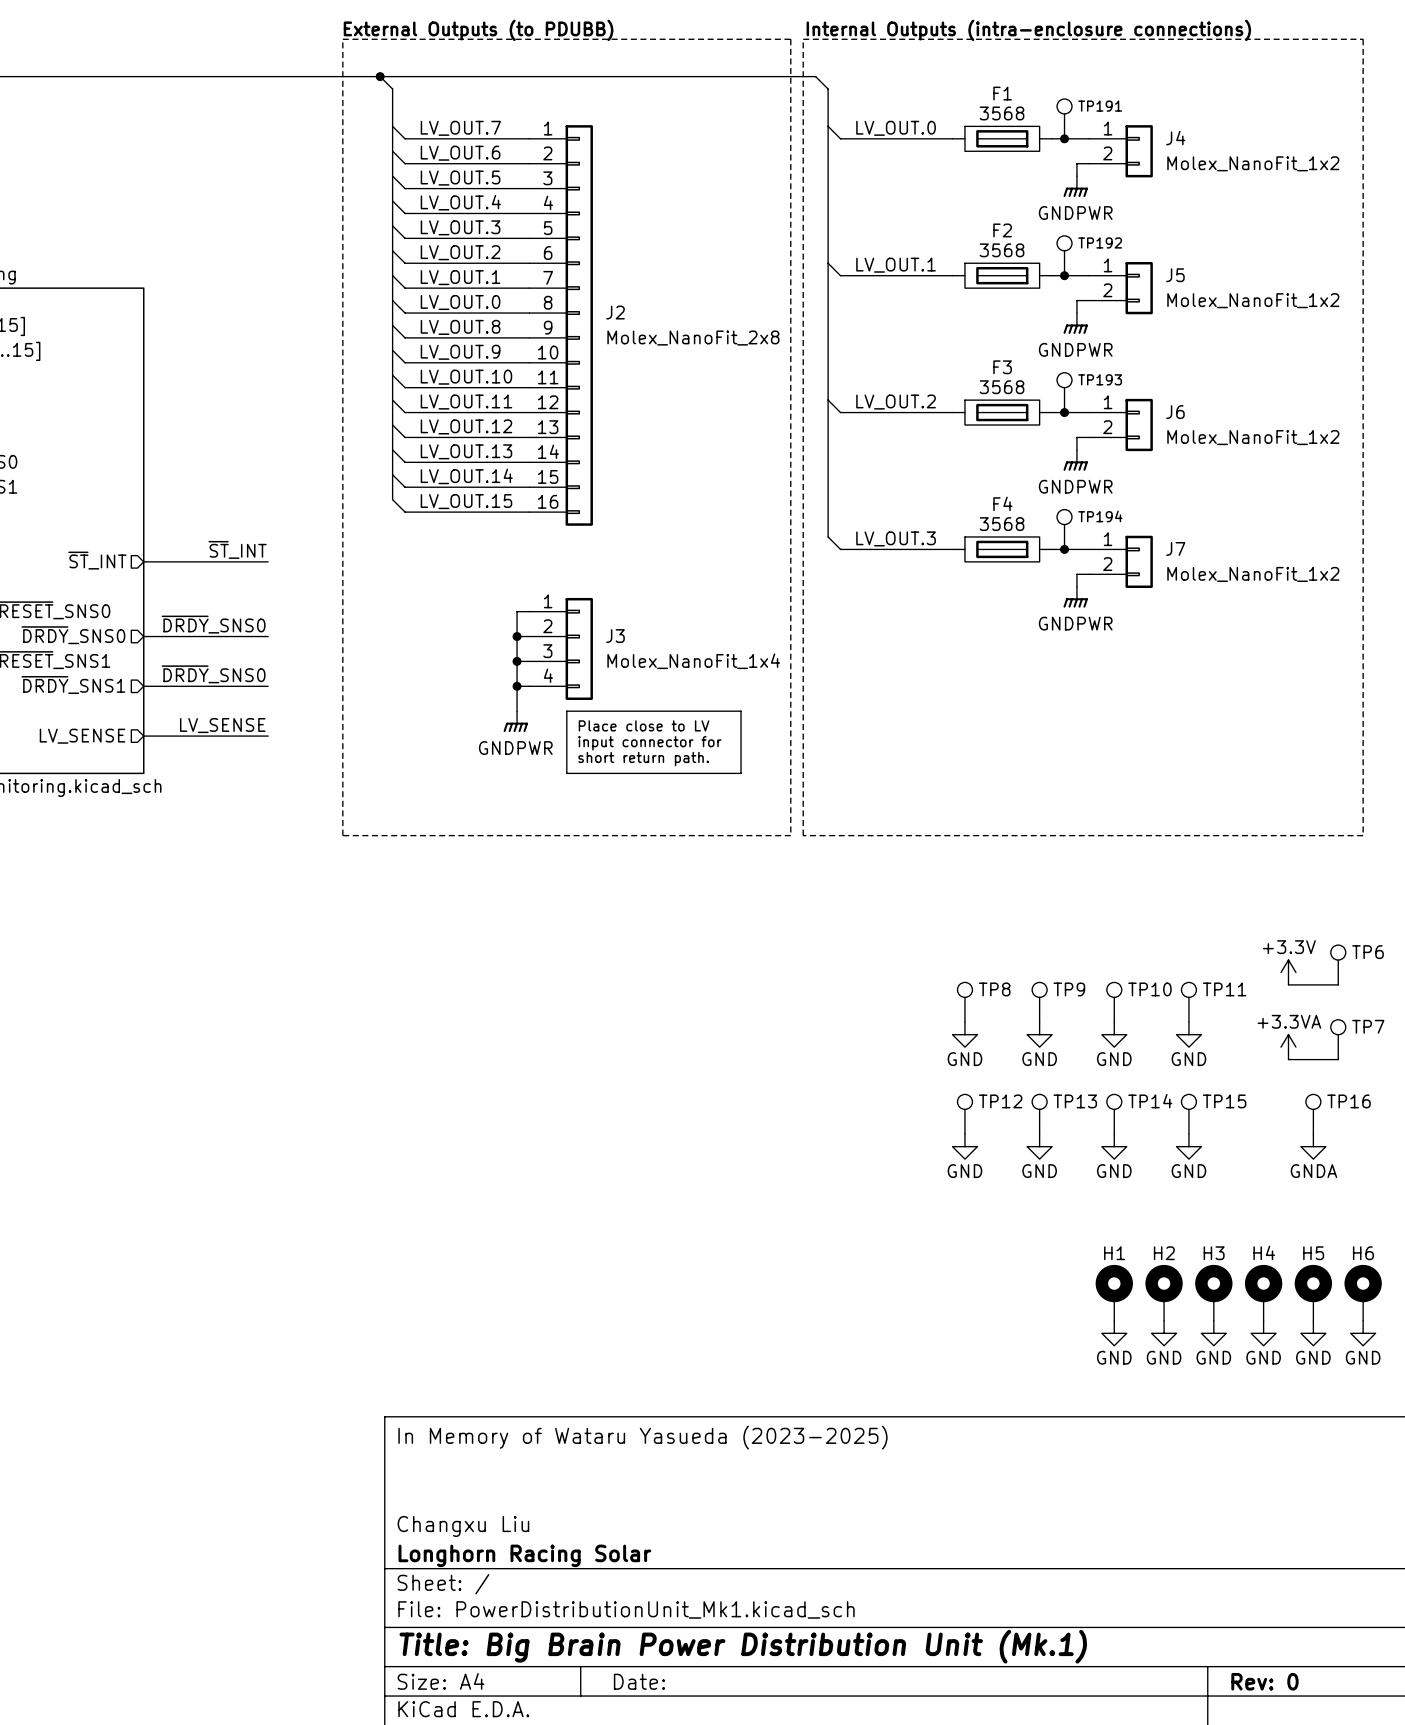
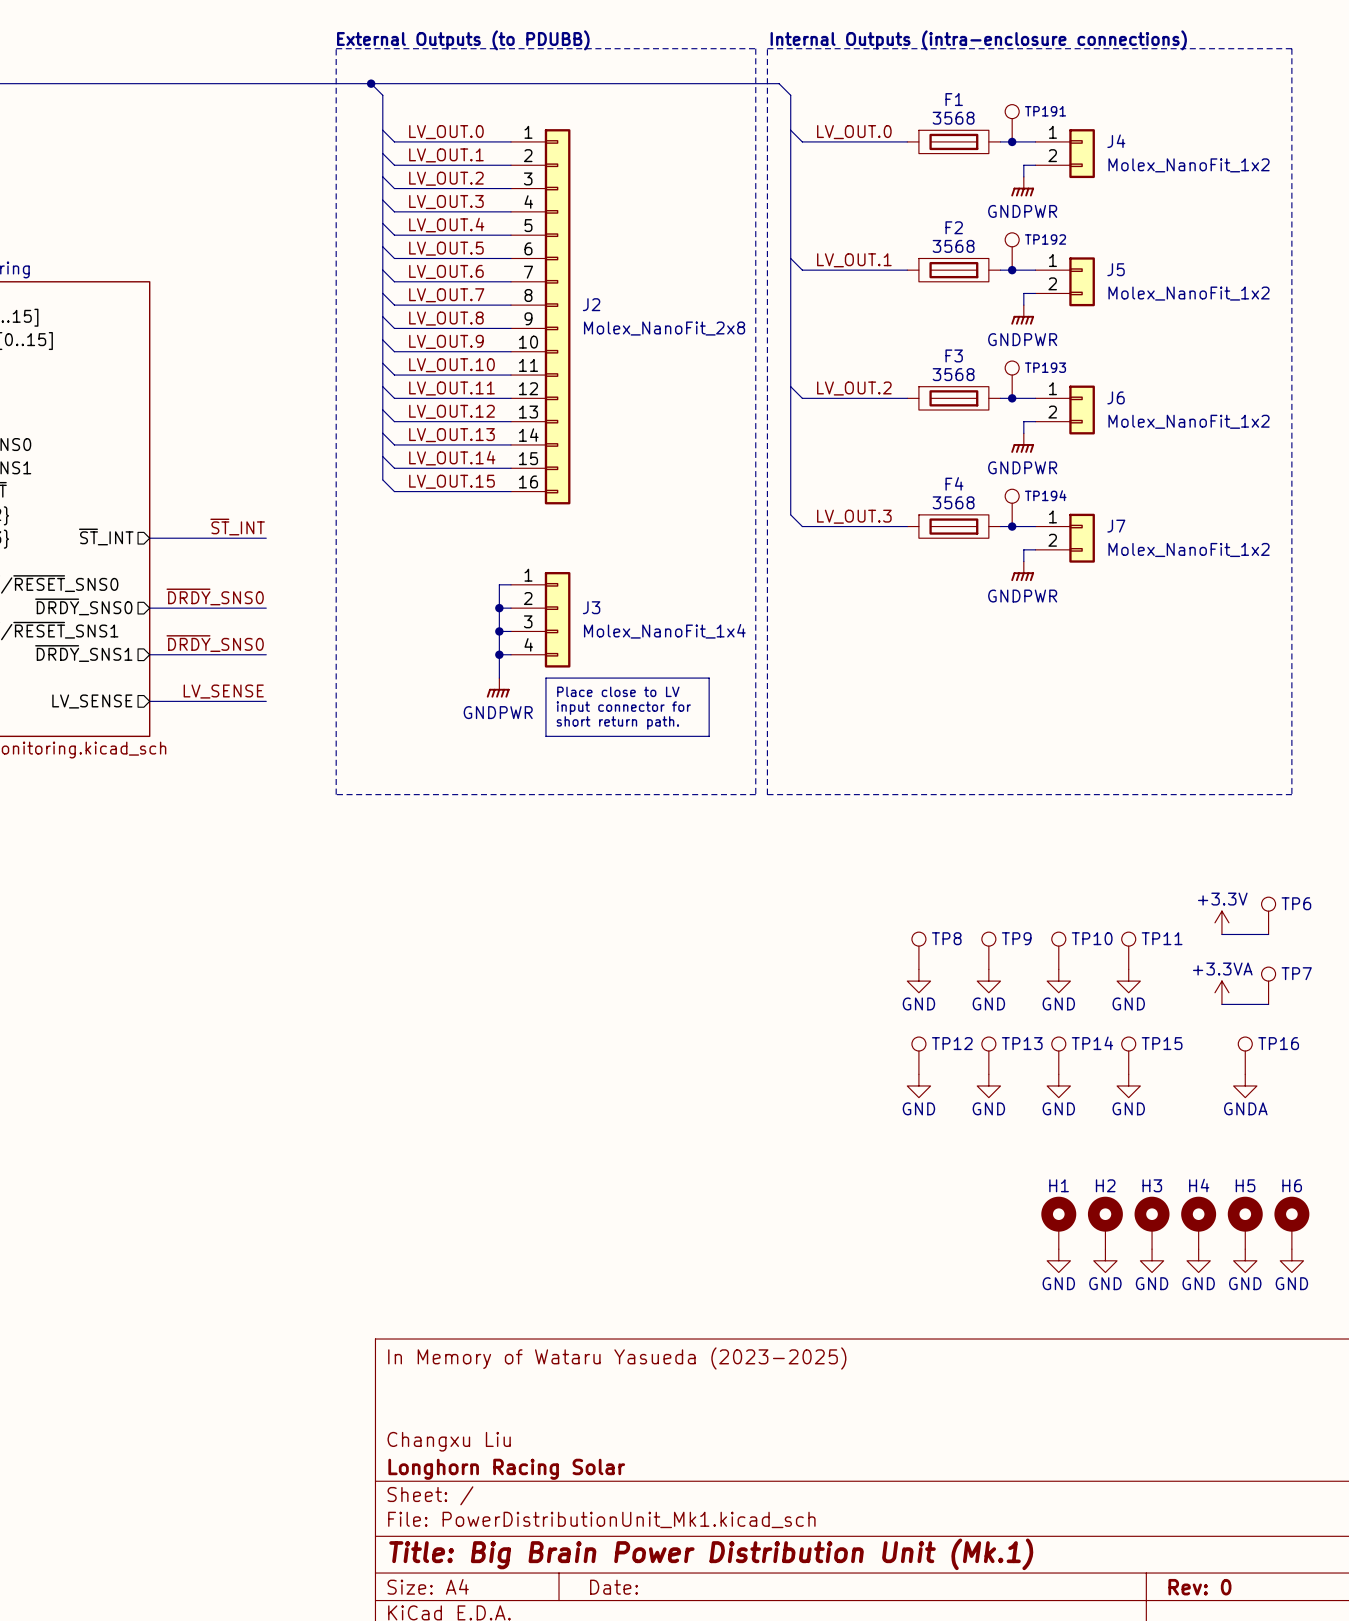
label: LV_OUT.7 (460, 128) -> LV_OUT.0 (446, 132)
label: LV_OUT.6 (460, 153) -> LV_OUT.1 (446, 155)
label: LV_OUT.5 (460, 178) -> LV_OUT.2 (446, 178)
label: LV_OUT.4 (460, 202) -> LV_OUT.3 (446, 202)
label: LV_OUT.3 (460, 227) -> LV_OUT.4 (446, 225)
label: LV_OUT.2 (460, 252) -> LV_OUT.5 (446, 248)
label: LV_OUT.1 (460, 277) -> LV_OUT.6 (446, 271)
label: LV_OUT.0 (460, 302) -> LV_OUT.7 (446, 295)

